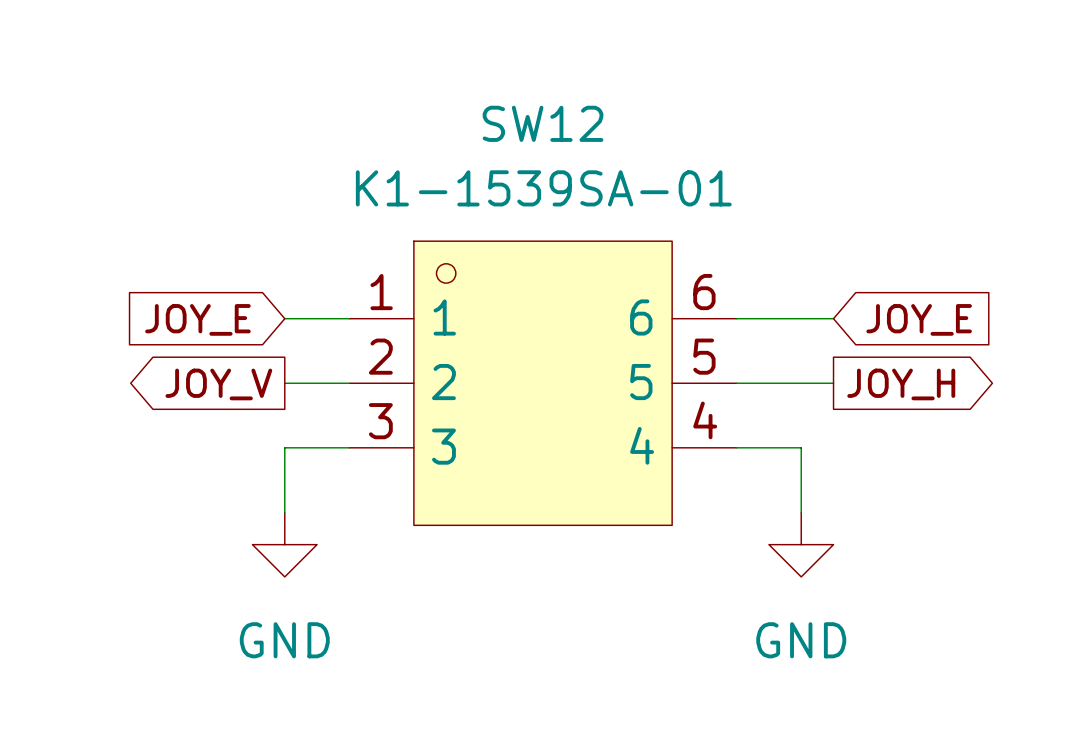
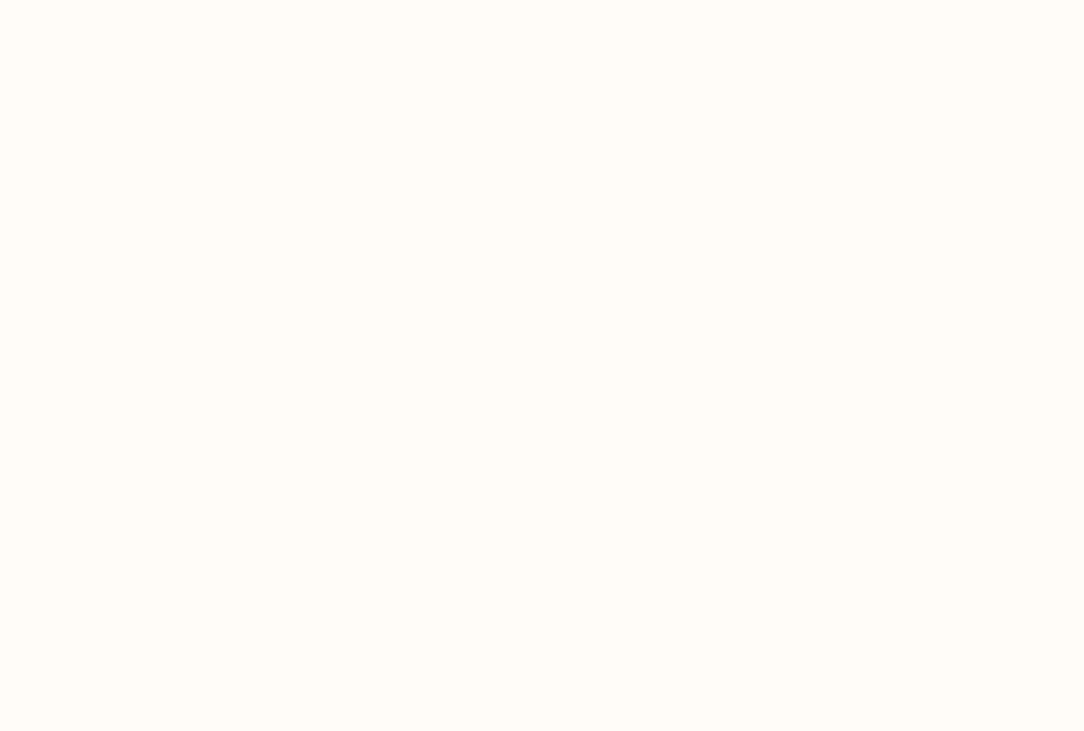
wire: (284, 318) (349, 318) -> none
wire: (736, 318) (833, 318) -> none
global label: JOY_E (197, 319) -> none
global label: JOY_E (919, 319) -> none
wire: (284, 383) (349, 383) -> none
SW12: K1-1539SA-01 (543, 383) -> none
wire: (736, 383) (833, 383) -> none
global label: JOY_V (218, 384) -> none
global label: JOY_H (901, 384) -> none
wire: (349, 447) (284, 447) (284, 512) -> none
wire: (736, 447) (801, 447) (801, 512) -> none
power symbol: GND (284, 544) -> none
power symbol: GND (801, 544) -> none

